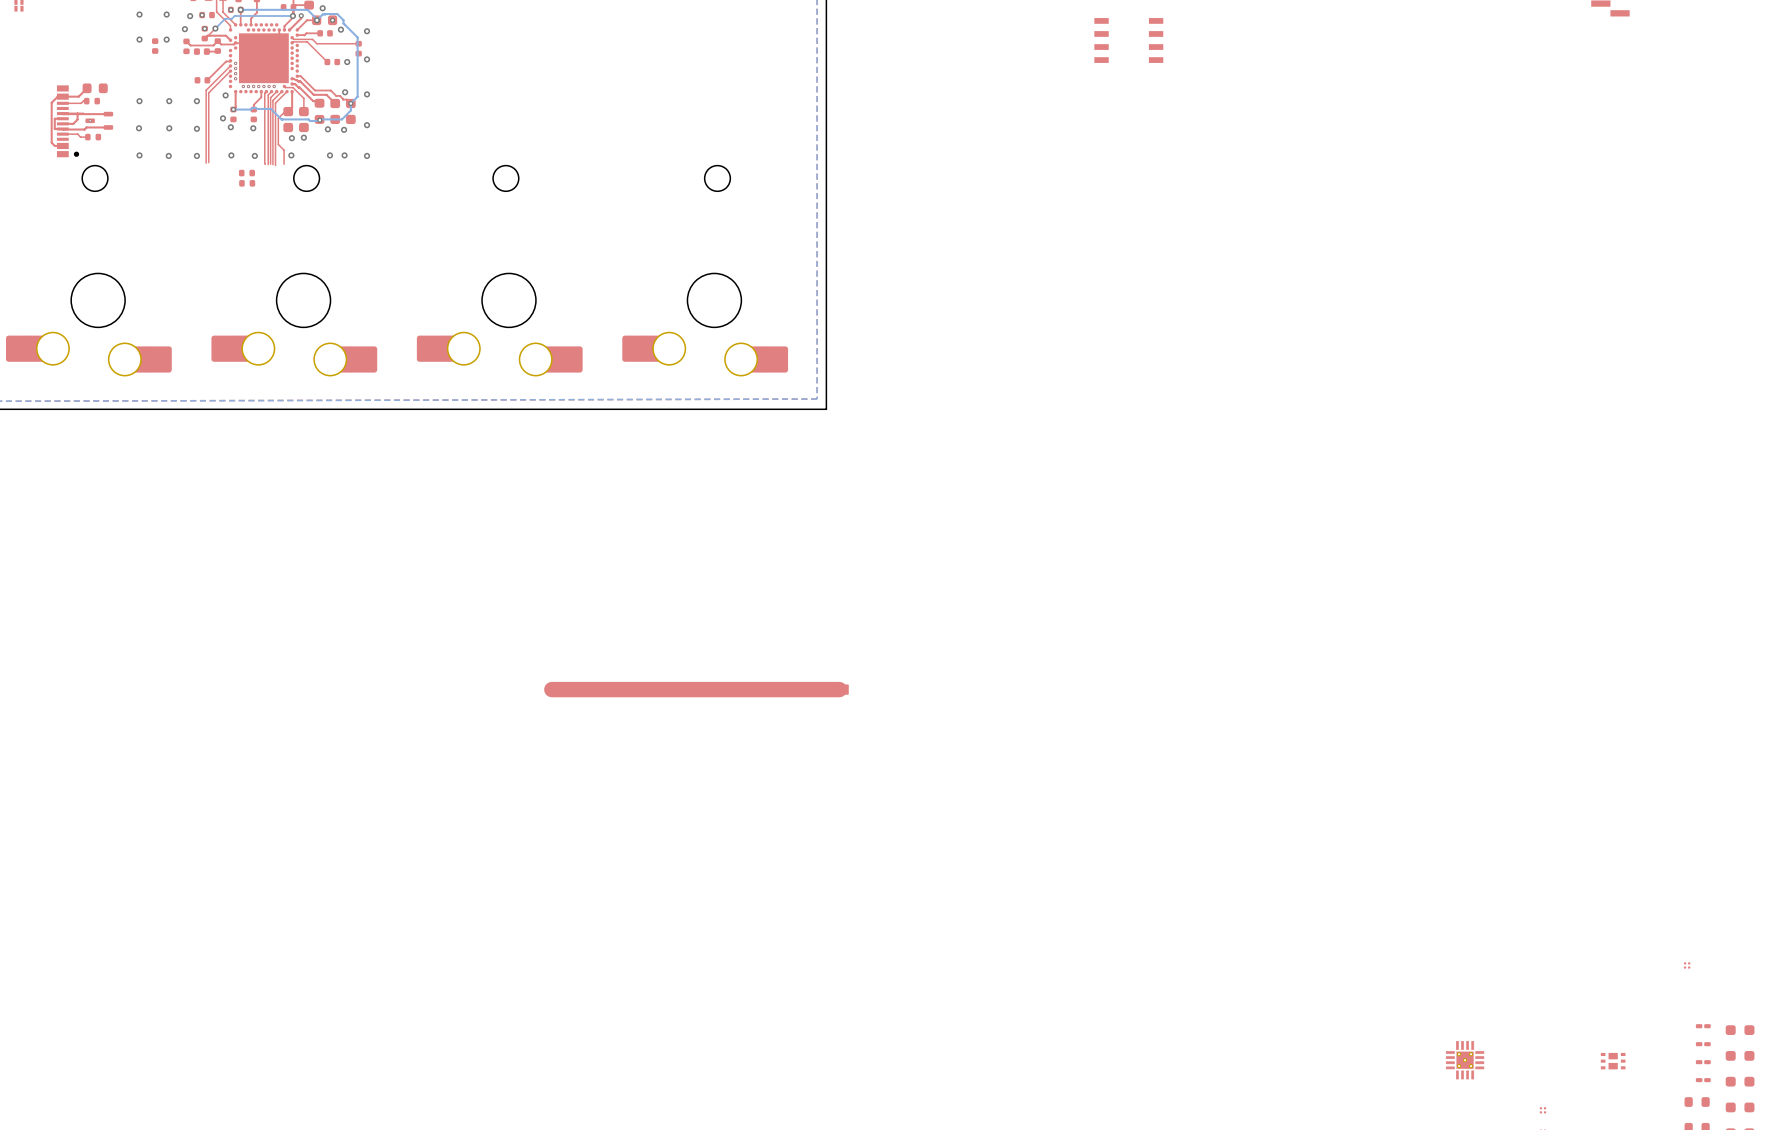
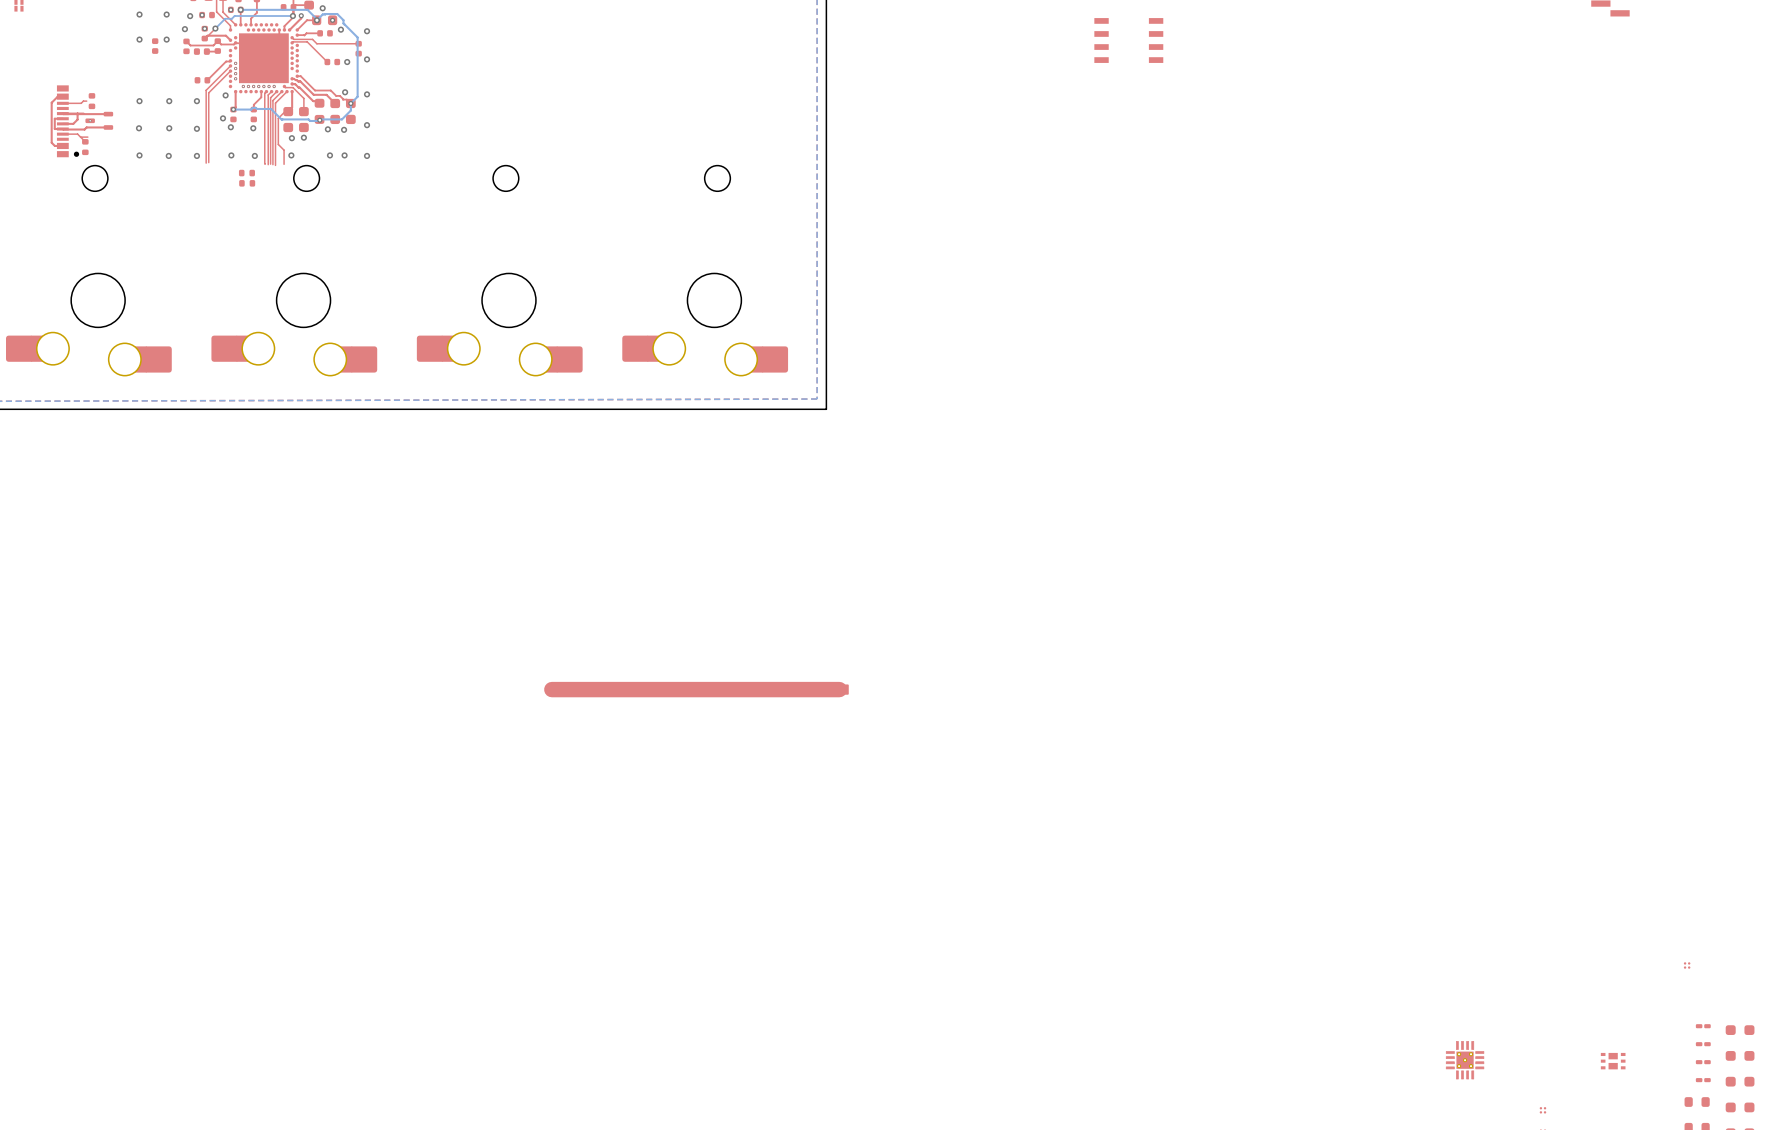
top track: (87, 88) (78, 96) (62, 96) -> none
part: (95, 88) -> none
part rotation: 0° (91, 101) -> 90° clockwise (91, 101)
part rotation: 0° (93, 137) -> 90° clockwise (85, 147)
part position: (93, 137) -> (85, 147)

